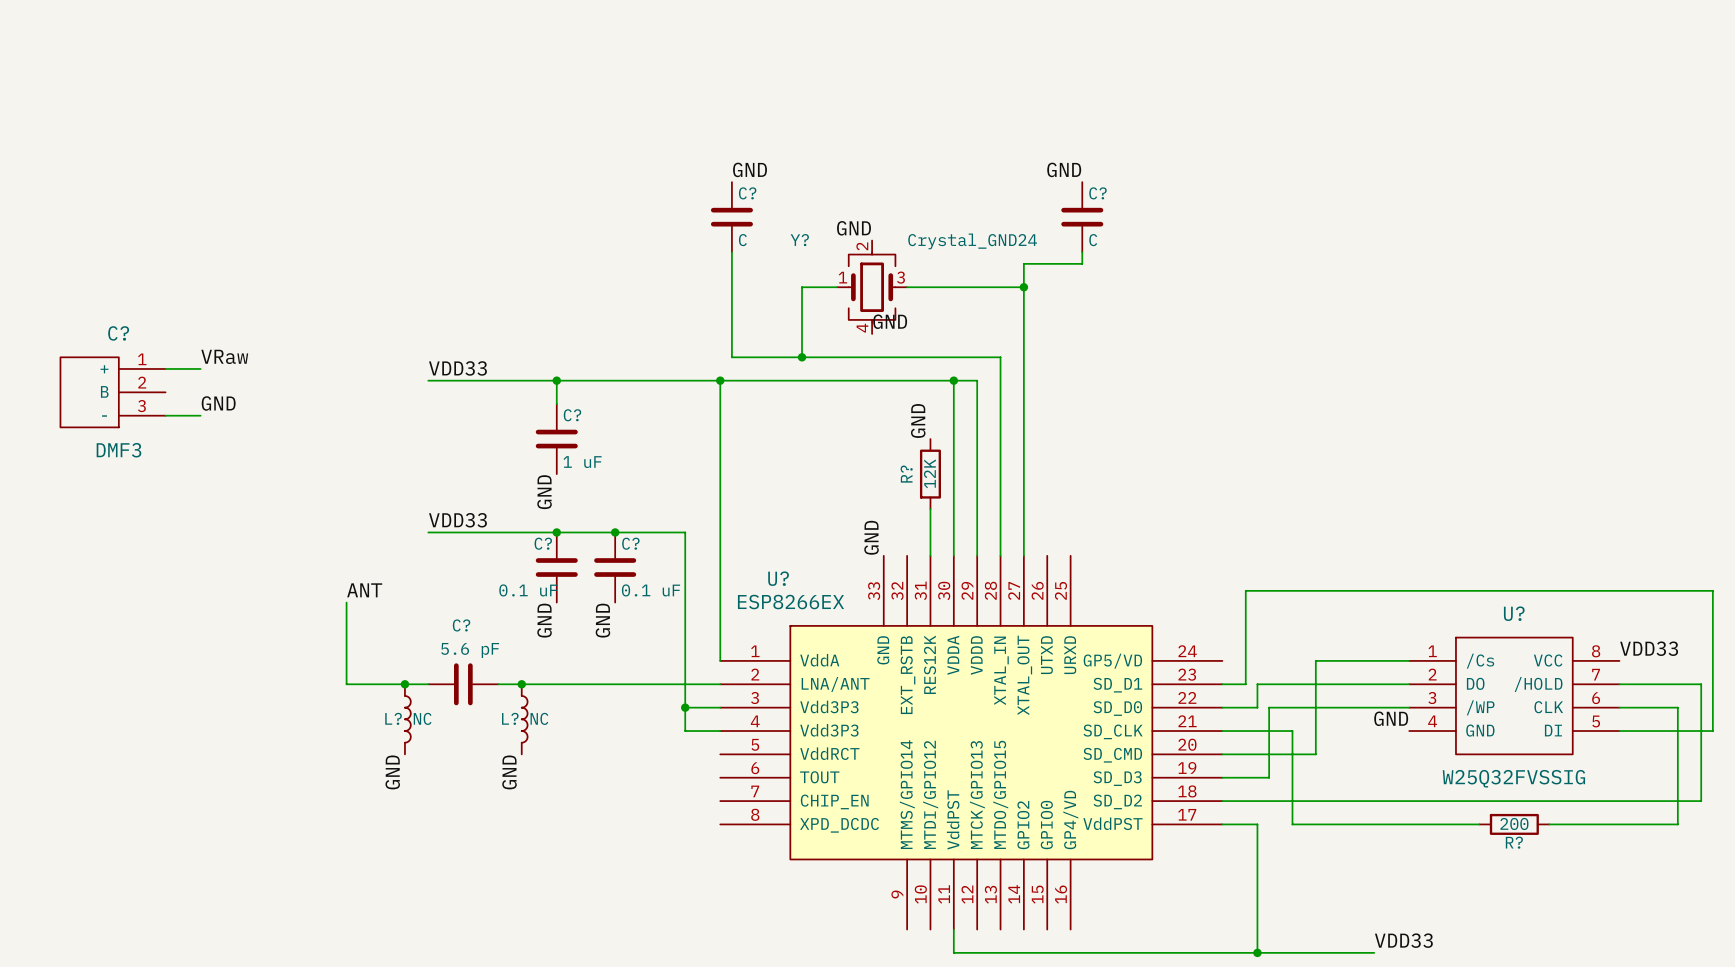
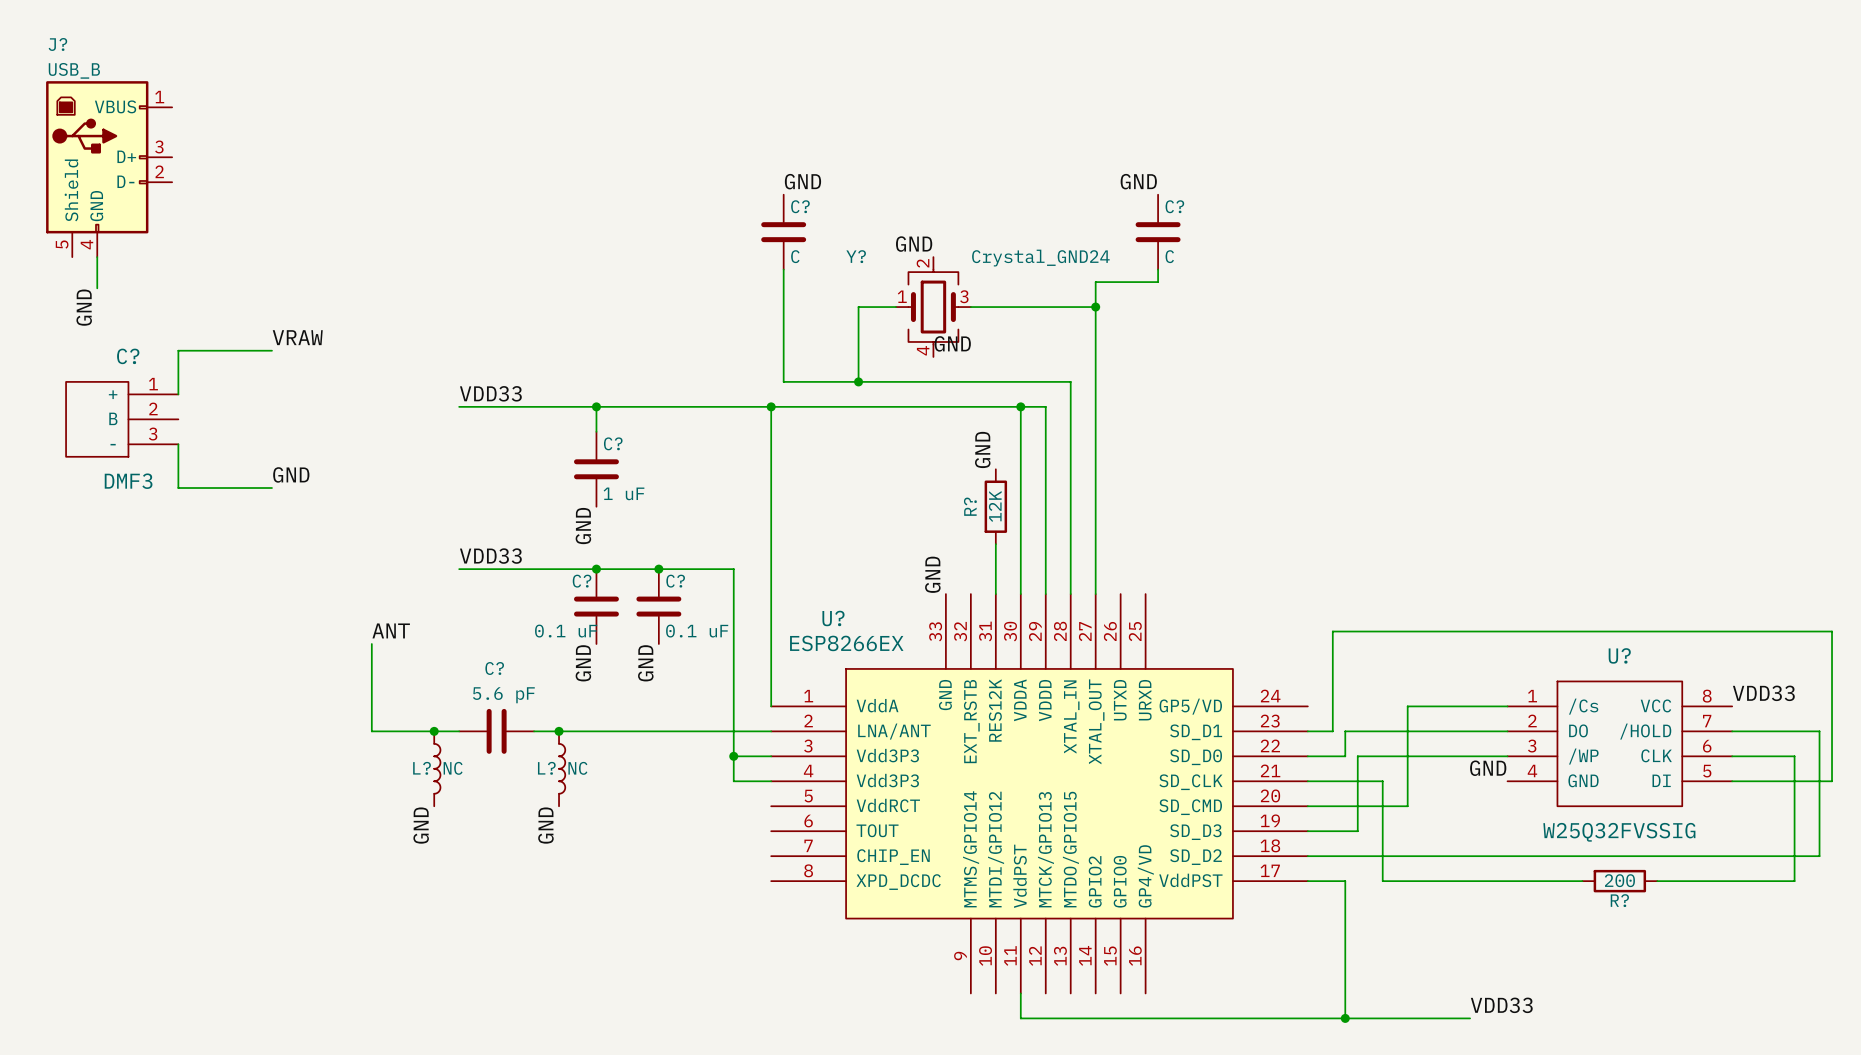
J?: none -> USB_B (109, 169)
wire: none -> (97, 257) (97, 288)
label: none -> GND (84, 307)
label: none -> VRAW (297, 337)
label: VRaw (224, 356) -> none
wire: (165, 368) (200, 368) -> (178, 394) (178, 350) (271, 350)
label position: GND (218, 403) -> GND (291, 474)
wire: (165, 415) (200, 415) -> (178, 444) (178, 488) (271, 488)

